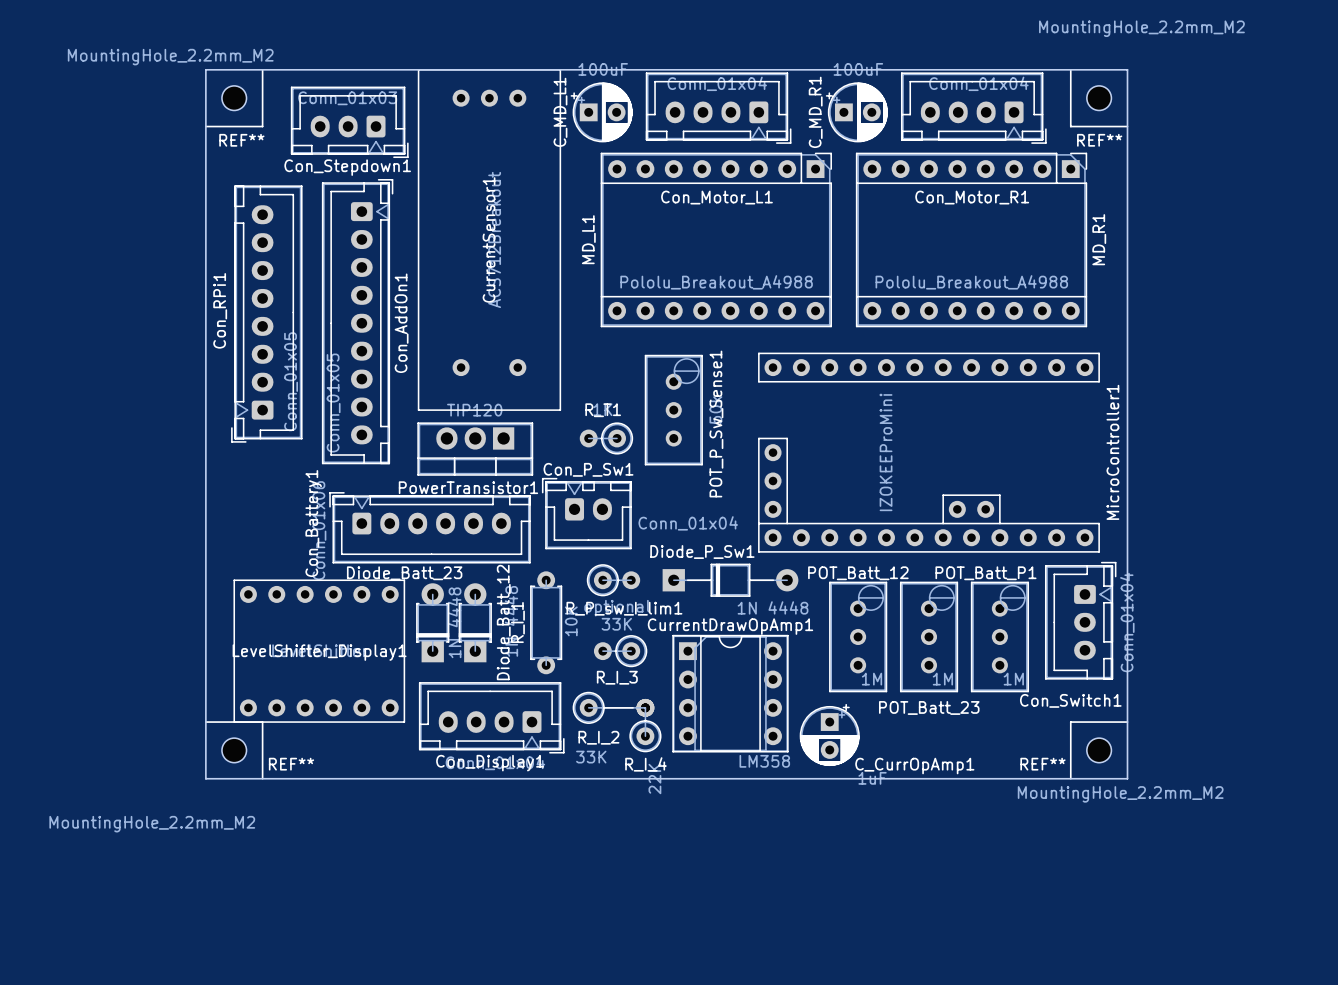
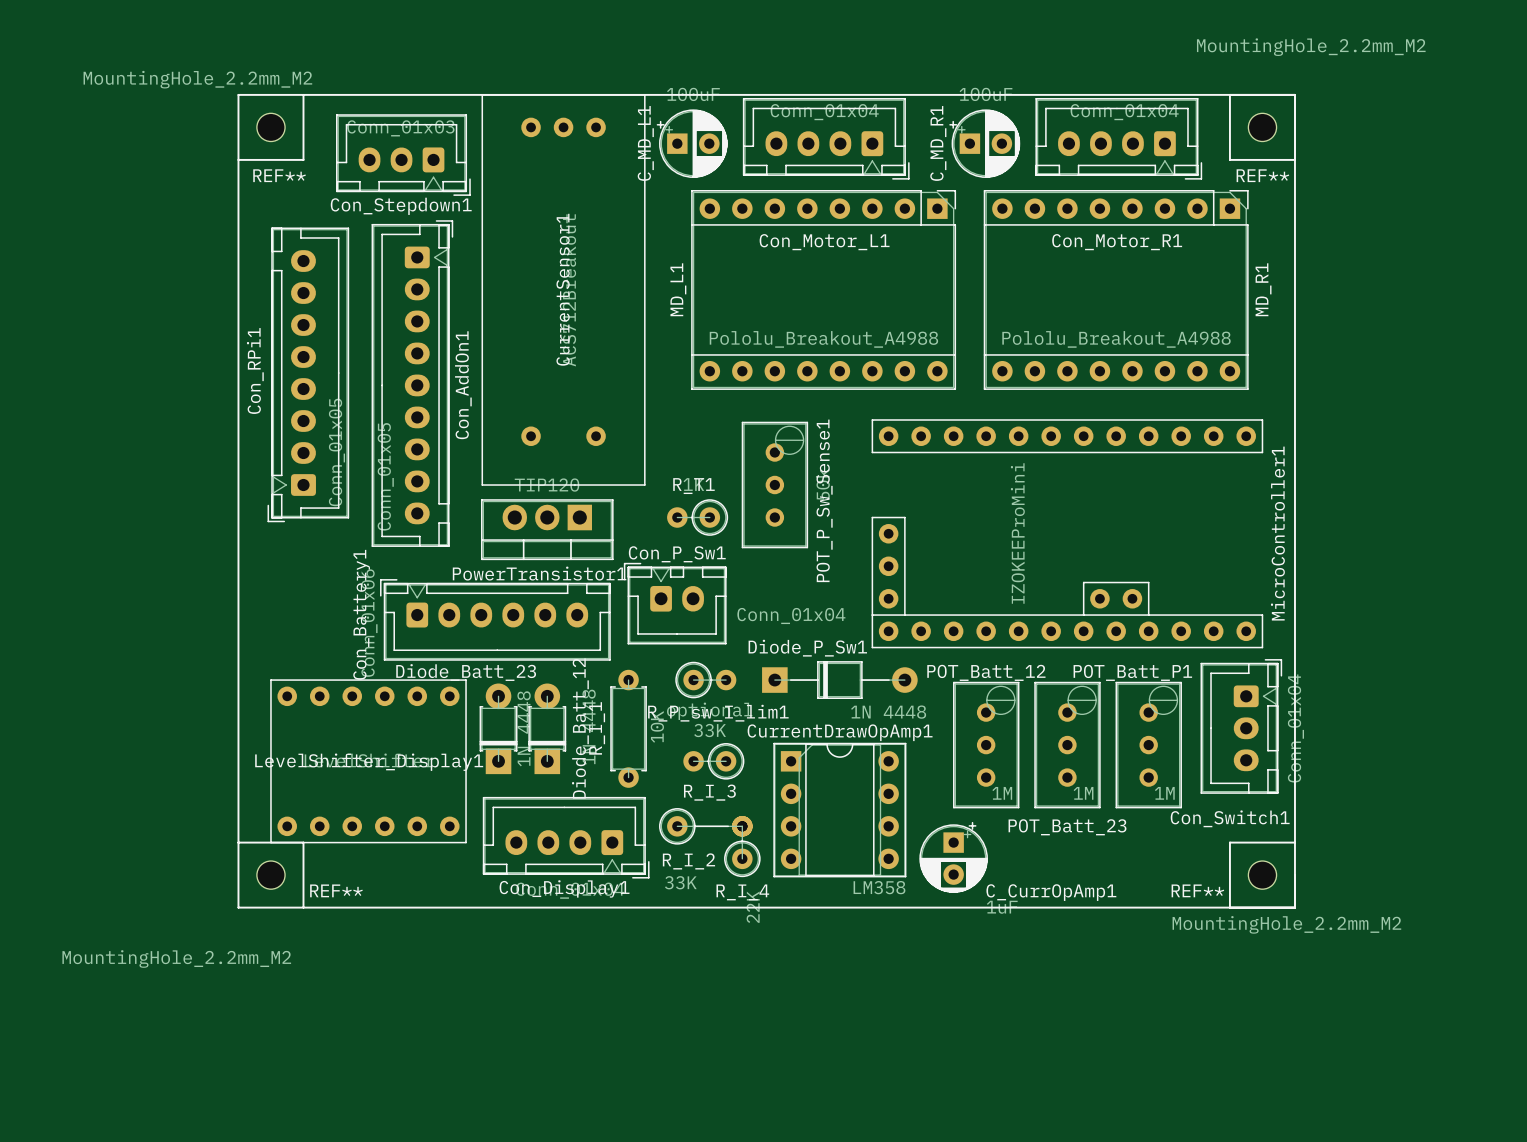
line: none -> (238, 94) (1294, 94) (1294, 907) (238, 907) (238, 94)
board edge: (205, 69) (205, 778) (1127, 778) (1127, 69) (205, 69) -> none

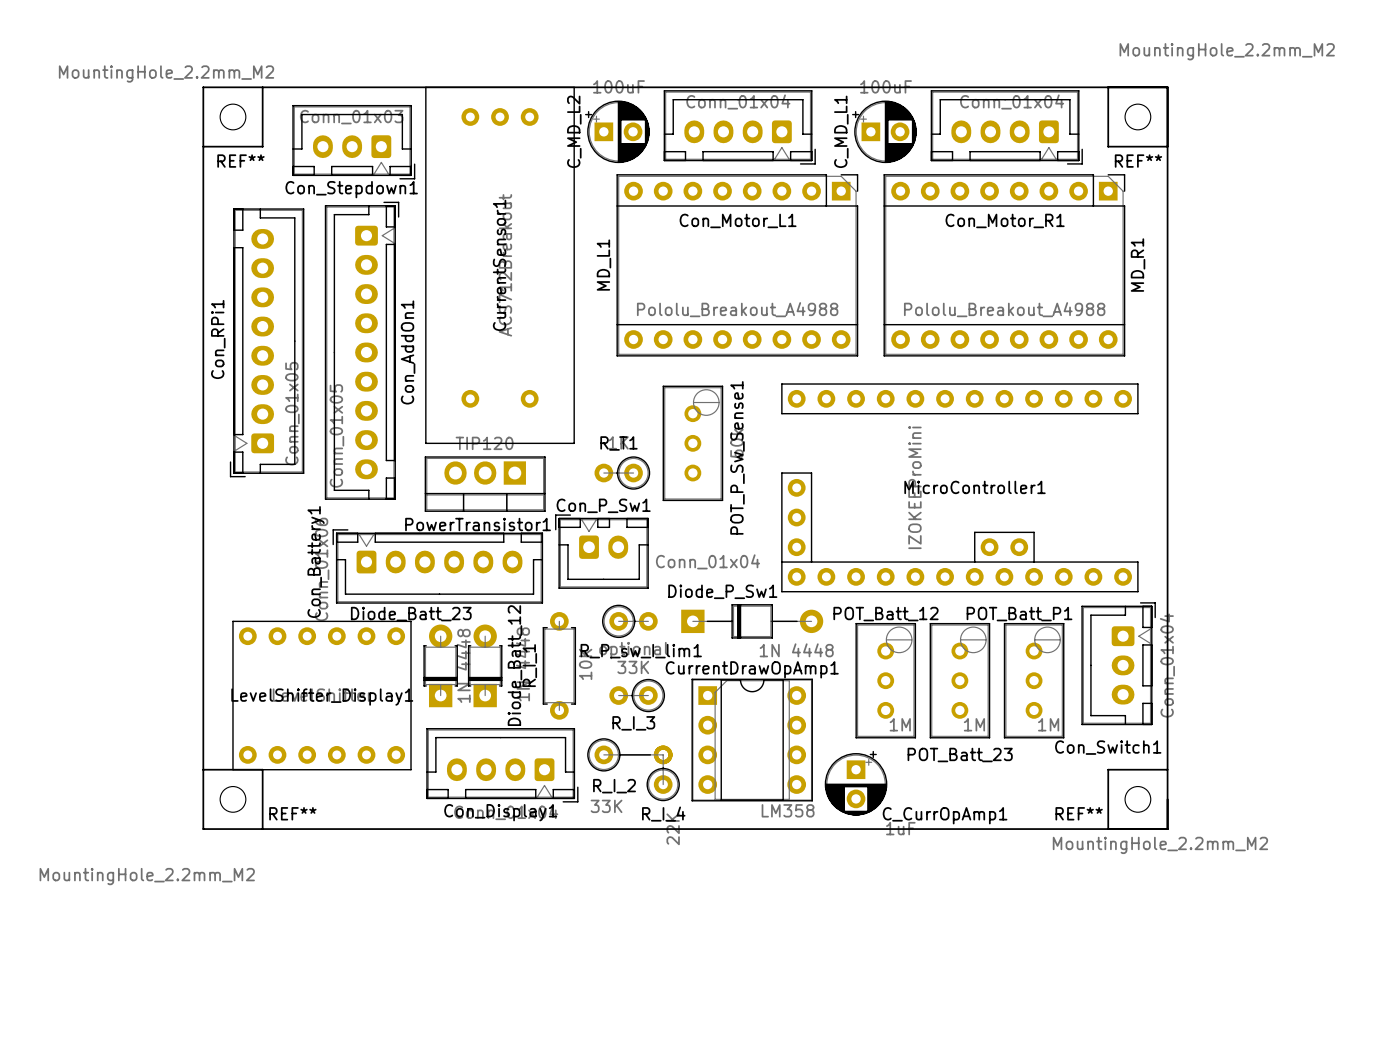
REF** value position: MountingHole_2.2mm_M2 (1311, 47) -> MountingHole_2.2mm_M2 (1227, 51)
C_MD_L1 name: C_MD_L1 (645, 143) -> C_MD_L2 (574, 131)
C_MD_R1 name: C_MD_R1 (938, 143) -> C_MD_L1 (841, 131)
MicroController1 name rotation: 0° (1277, 533) -> 90° clockwise (975, 487)

